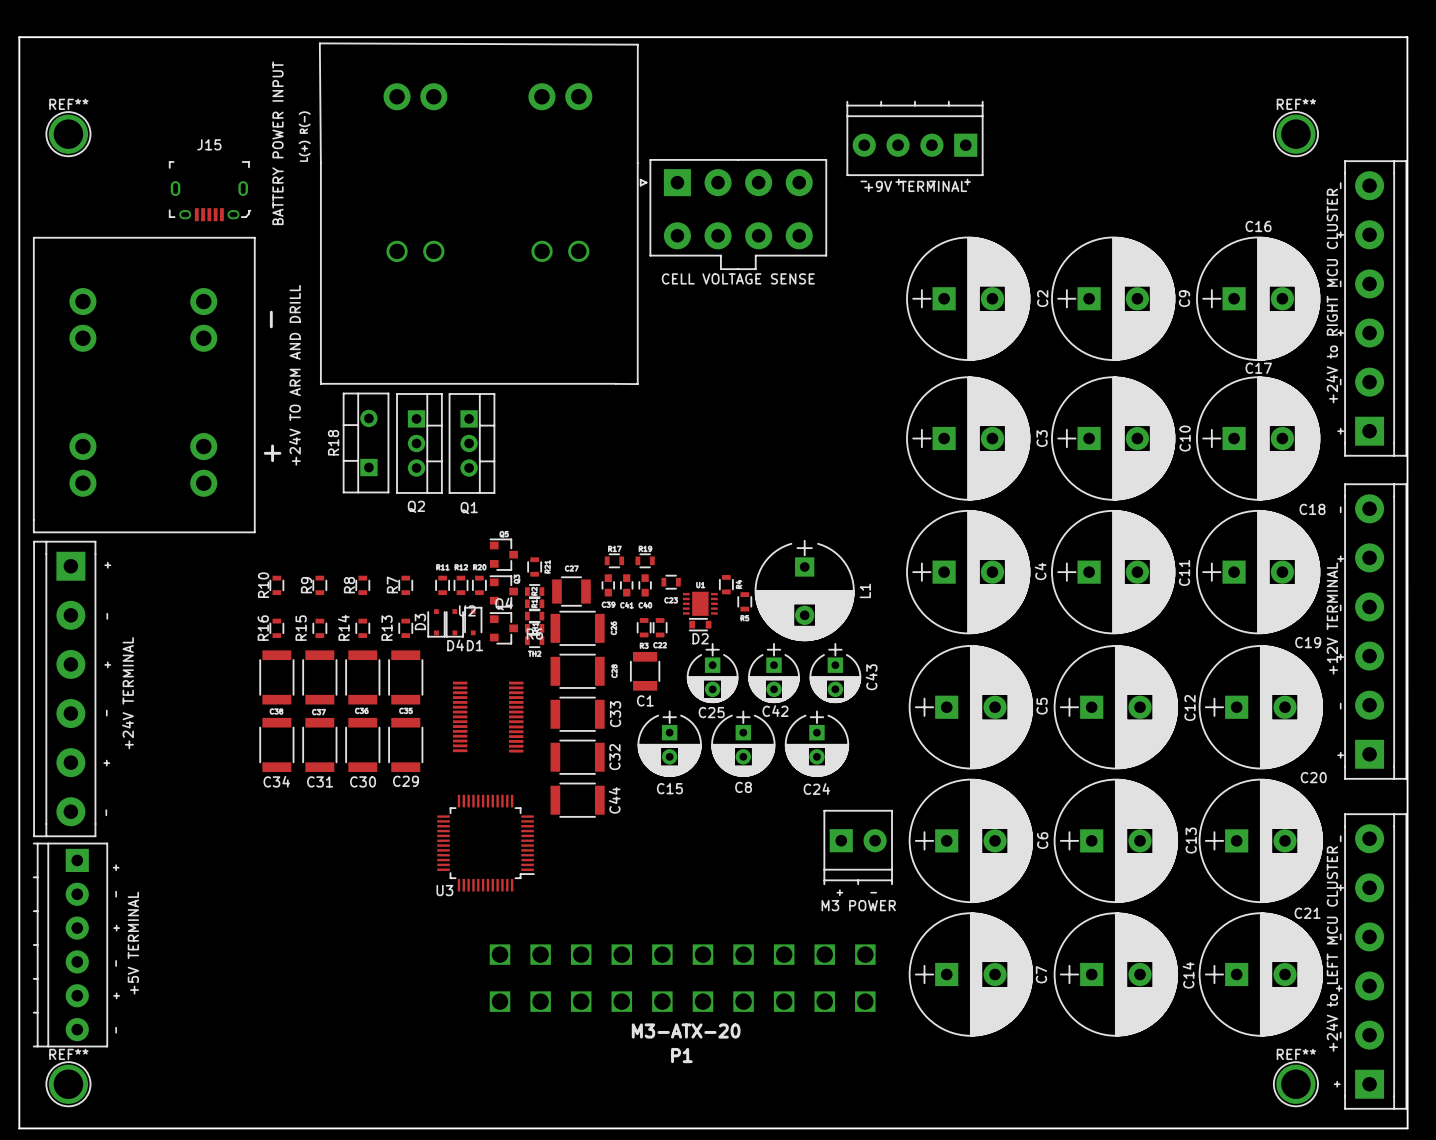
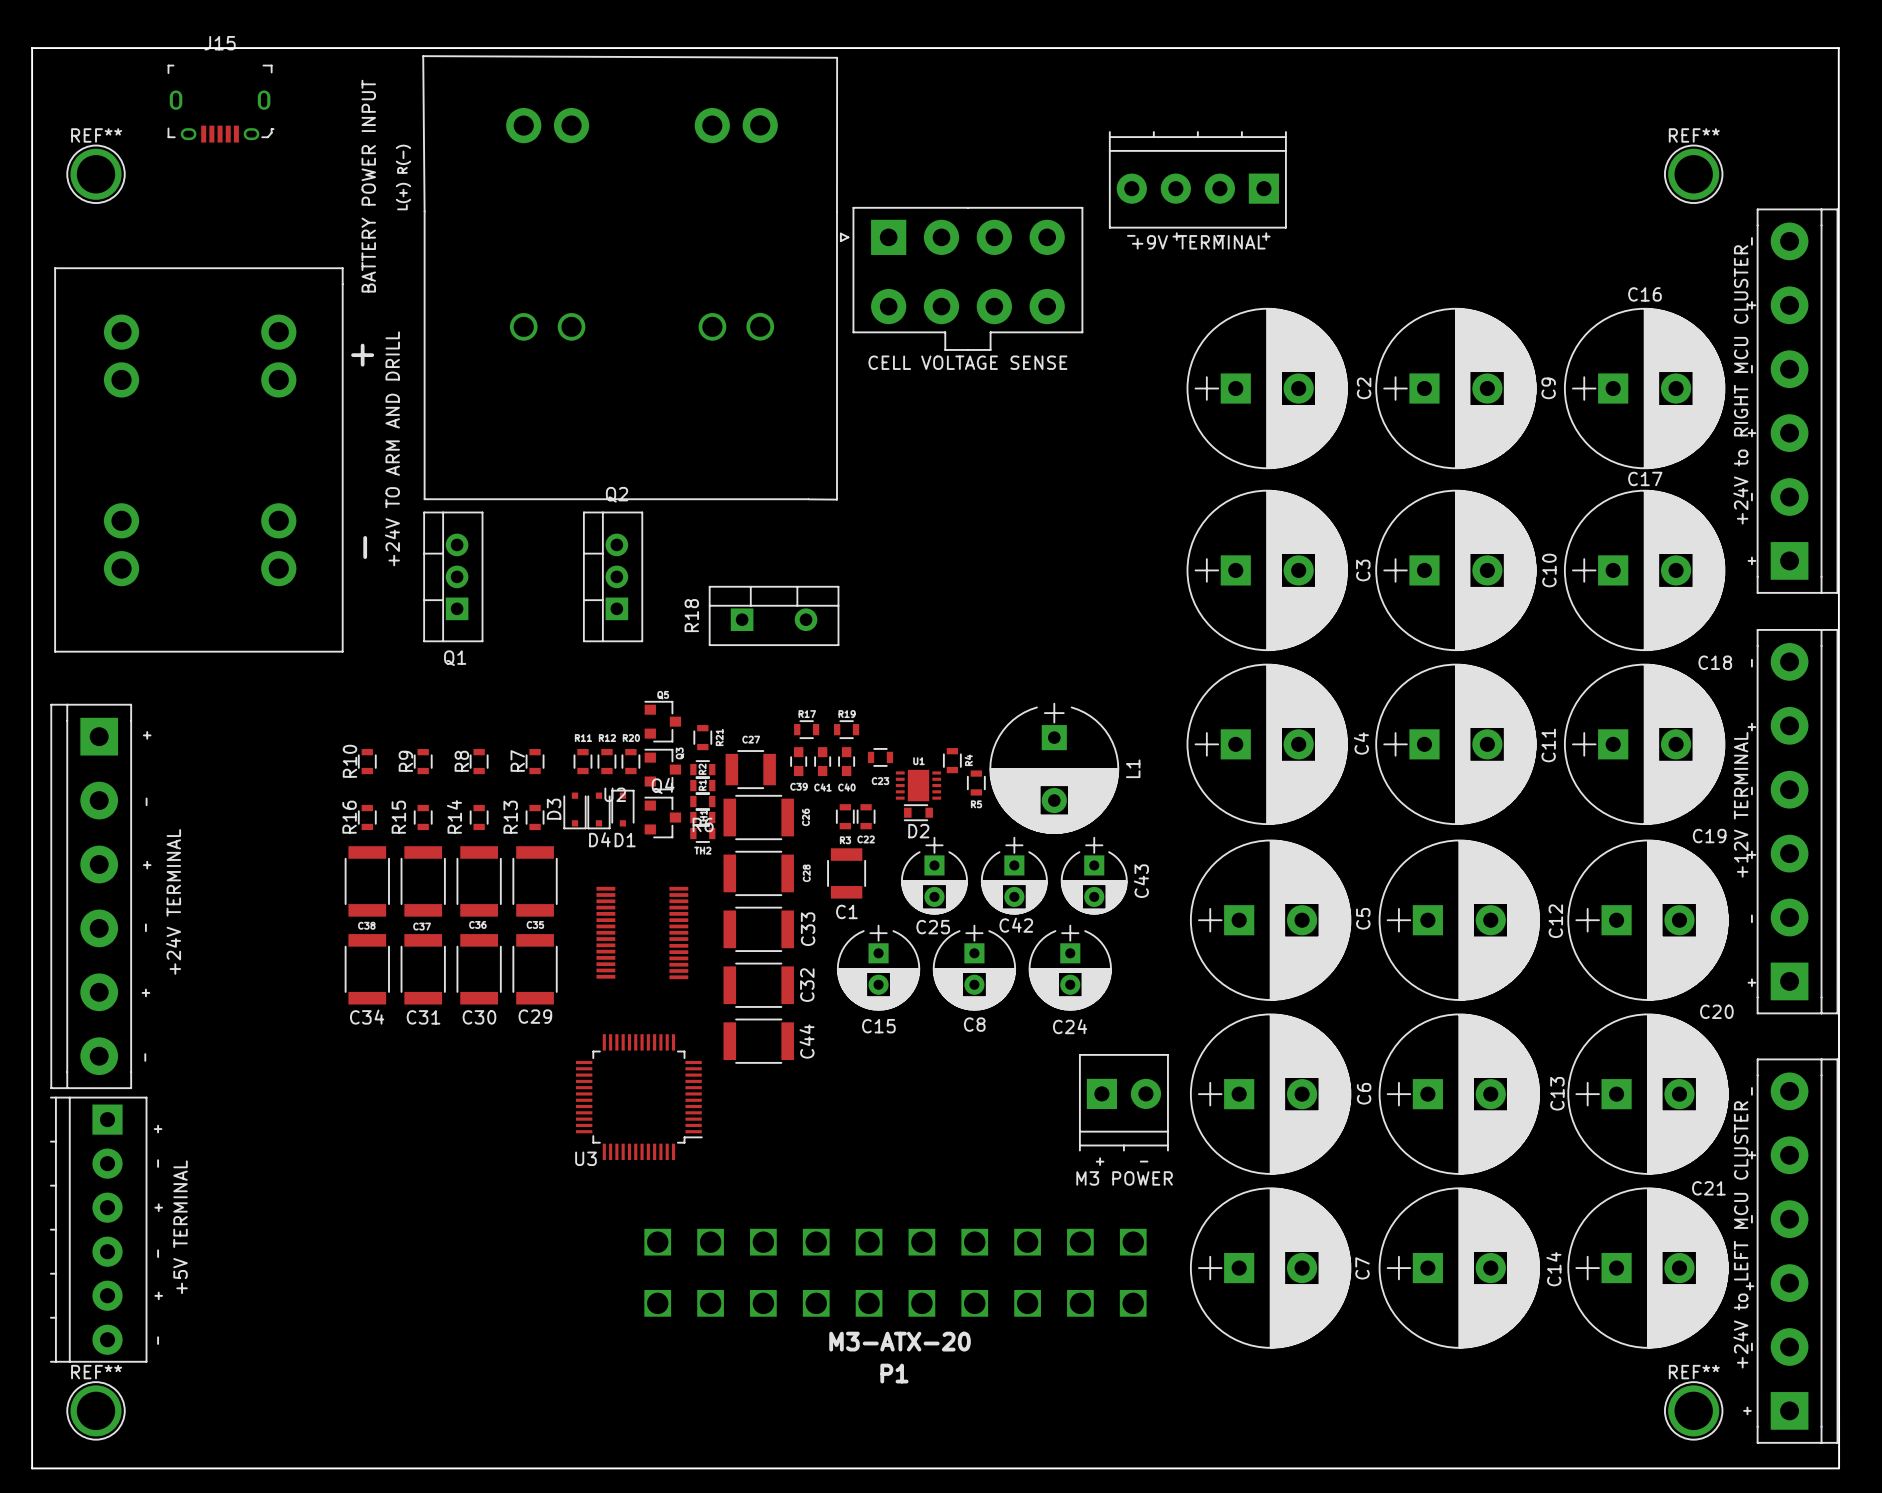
J15 position: (210, 191) -> (221, 103)
text position: - (271, 319) -> - (365, 547)
+24V TO ARM AND DRILL rotation: 0° (144, 385) -> 180° (198, 459)
R18 name position: R18 (333, 442) -> R18 (691, 615)
R18 rotation: 0° (366, 442) -> 90° clockwise (774, 615)
R18 position: (366, 442) -> (774, 615)
Q2 rotation: 0° (419, 443) -> 180° (613, 576)
Q1 rotation: 0° (471, 443) -> 180° (453, 576)
Q1 position: (471, 443) -> (453, 576)
text position: + (272, 453) -> + (362, 355)

